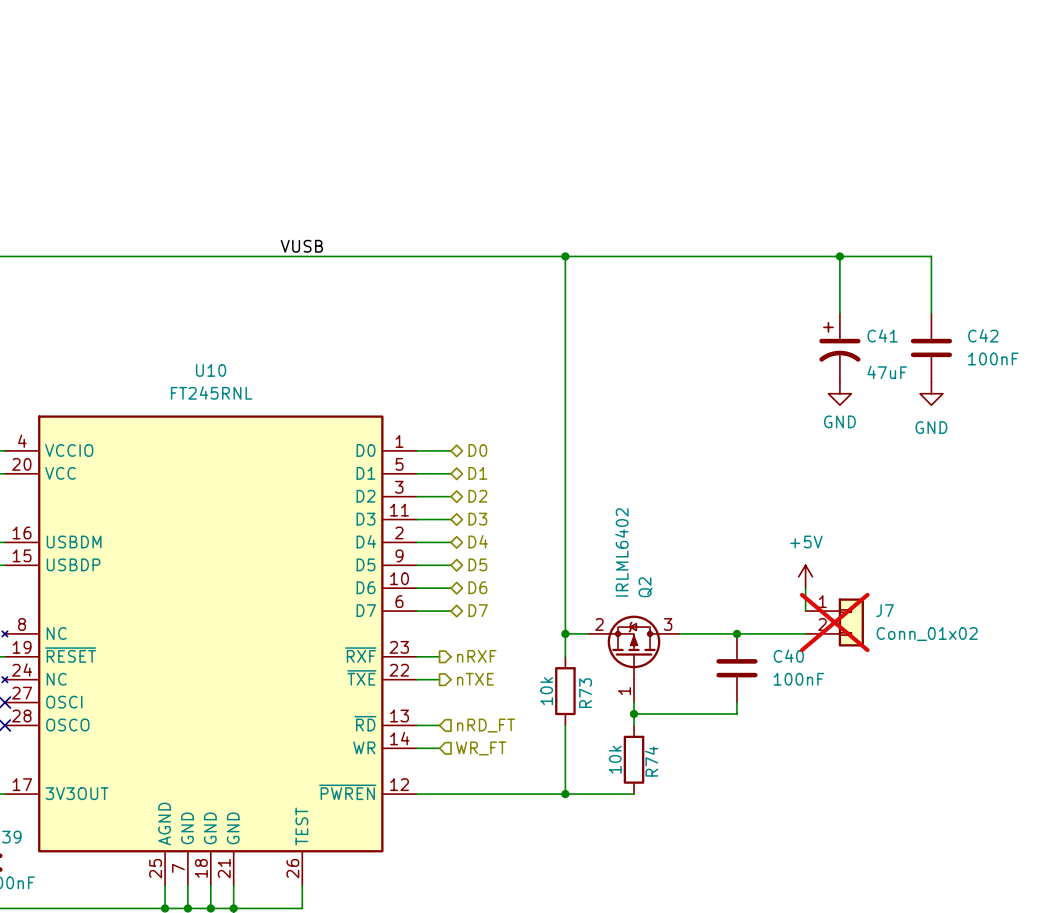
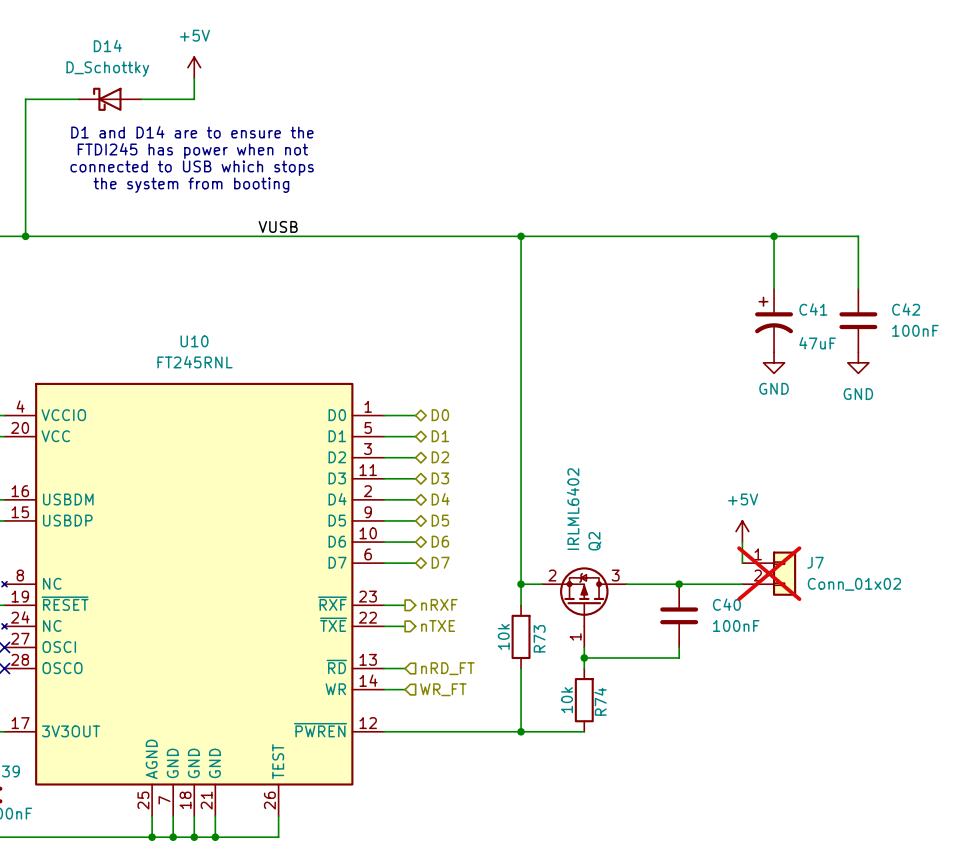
power symbol: none -> +5V (194, 67)
wire: none -> (194, 78) (194, 99) (141, 99)
wire: none -> (78, 99) (25, 99) (25, 236)
D14: none -> D_Schottky (109, 99)
text: none -> D1 and D14 are to ensure the (192, 132)
text: none -> FTDI245 has power when not (192, 151)
text: none -> connected to USB which stops (192, 168)
text: none -> the system from booting (191, 185)
junction: none -> (25, 236)

